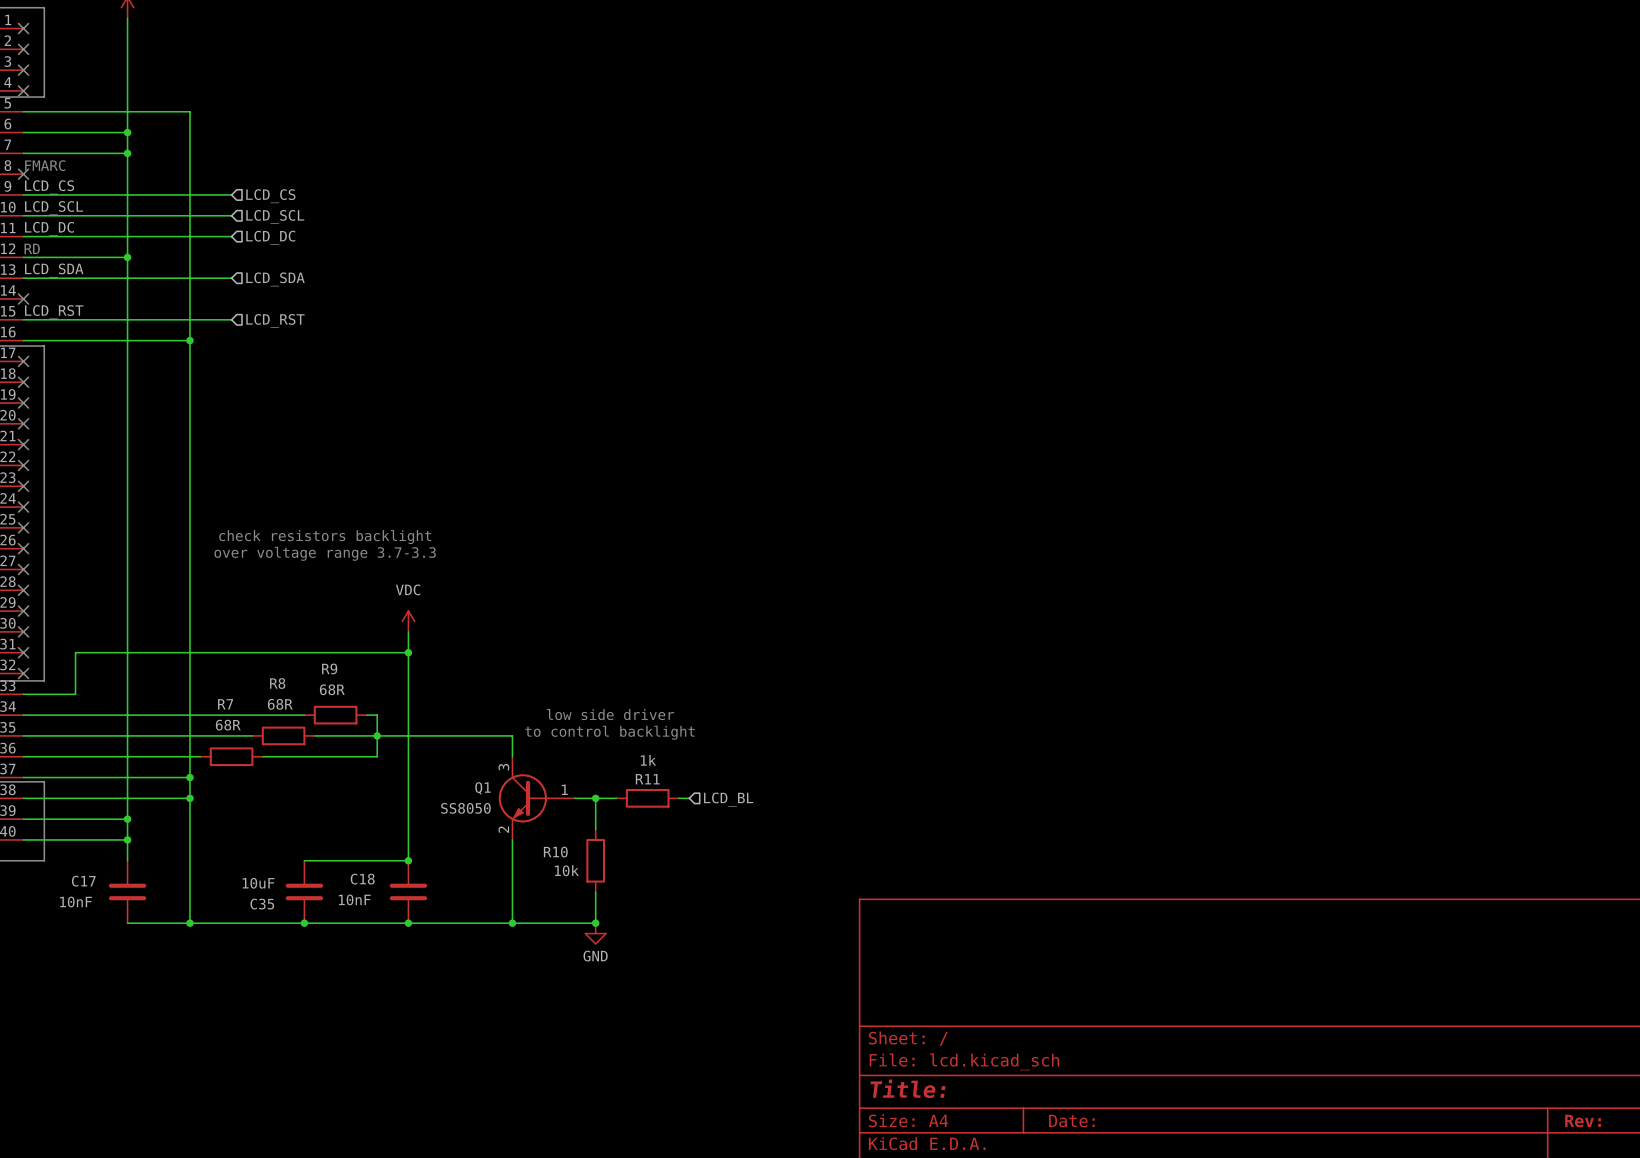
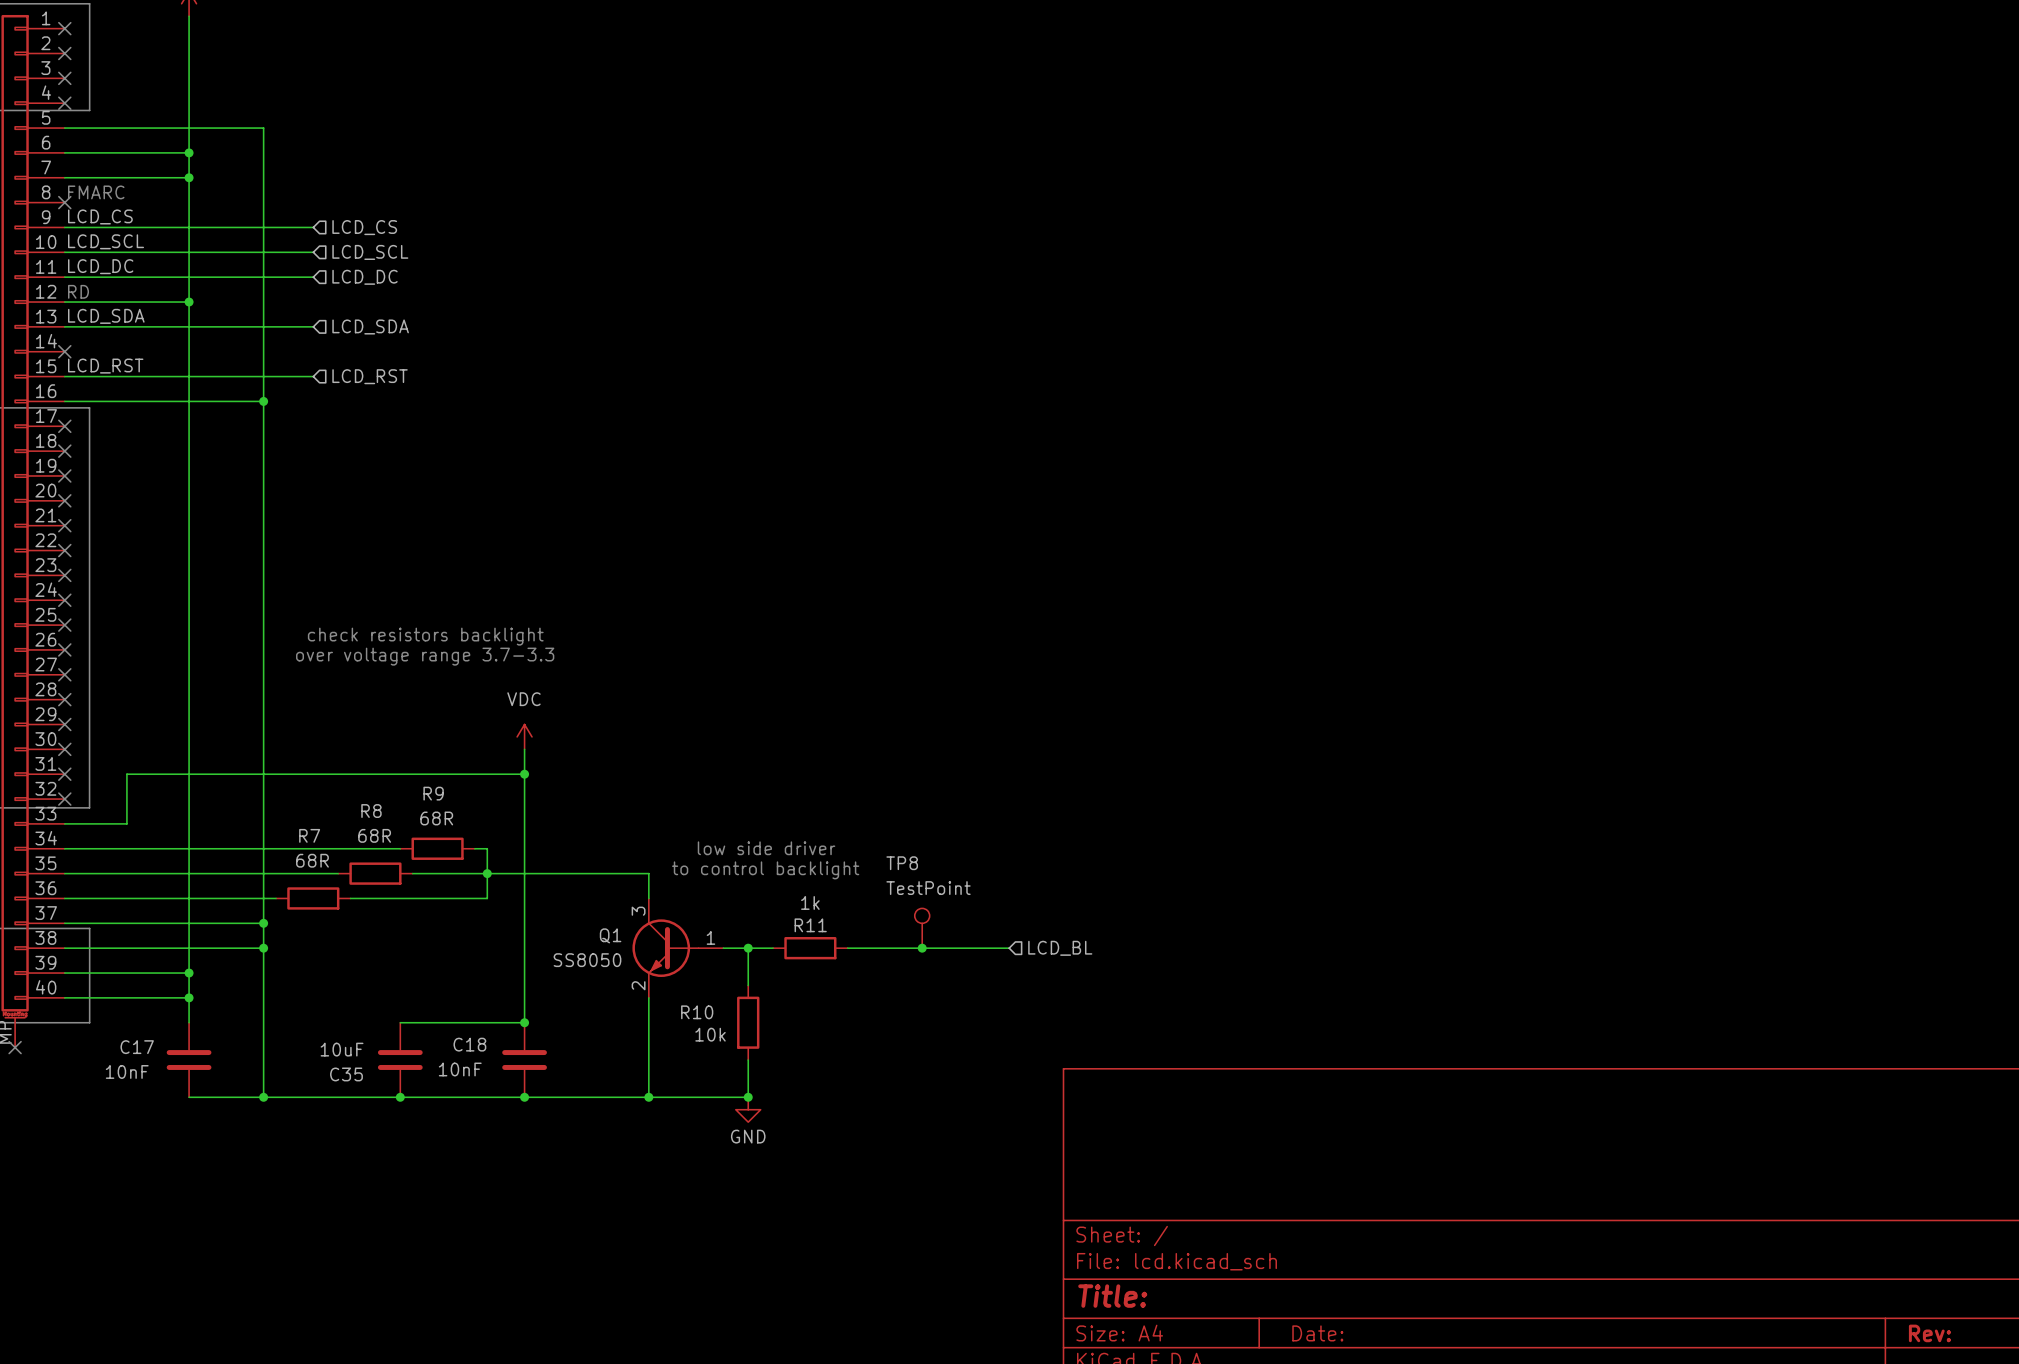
TP8: none -> TestPoint (922, 928)
wire: none -> (860, 948) (1009, 948)
junction: none -> (922, 948)
hierarchical label position: LCD_BL (728, 799) -> LCD_BL (1060, 948)

